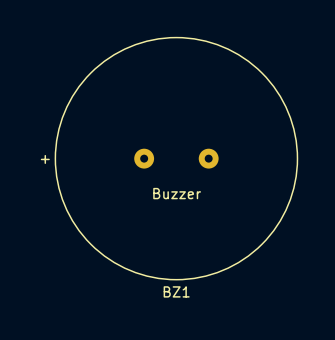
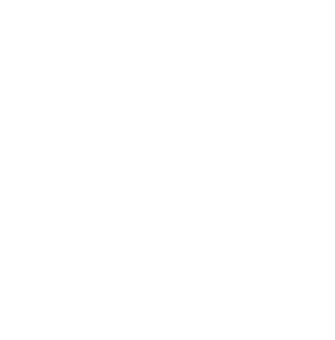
BZ1: (176, 158) -> none

